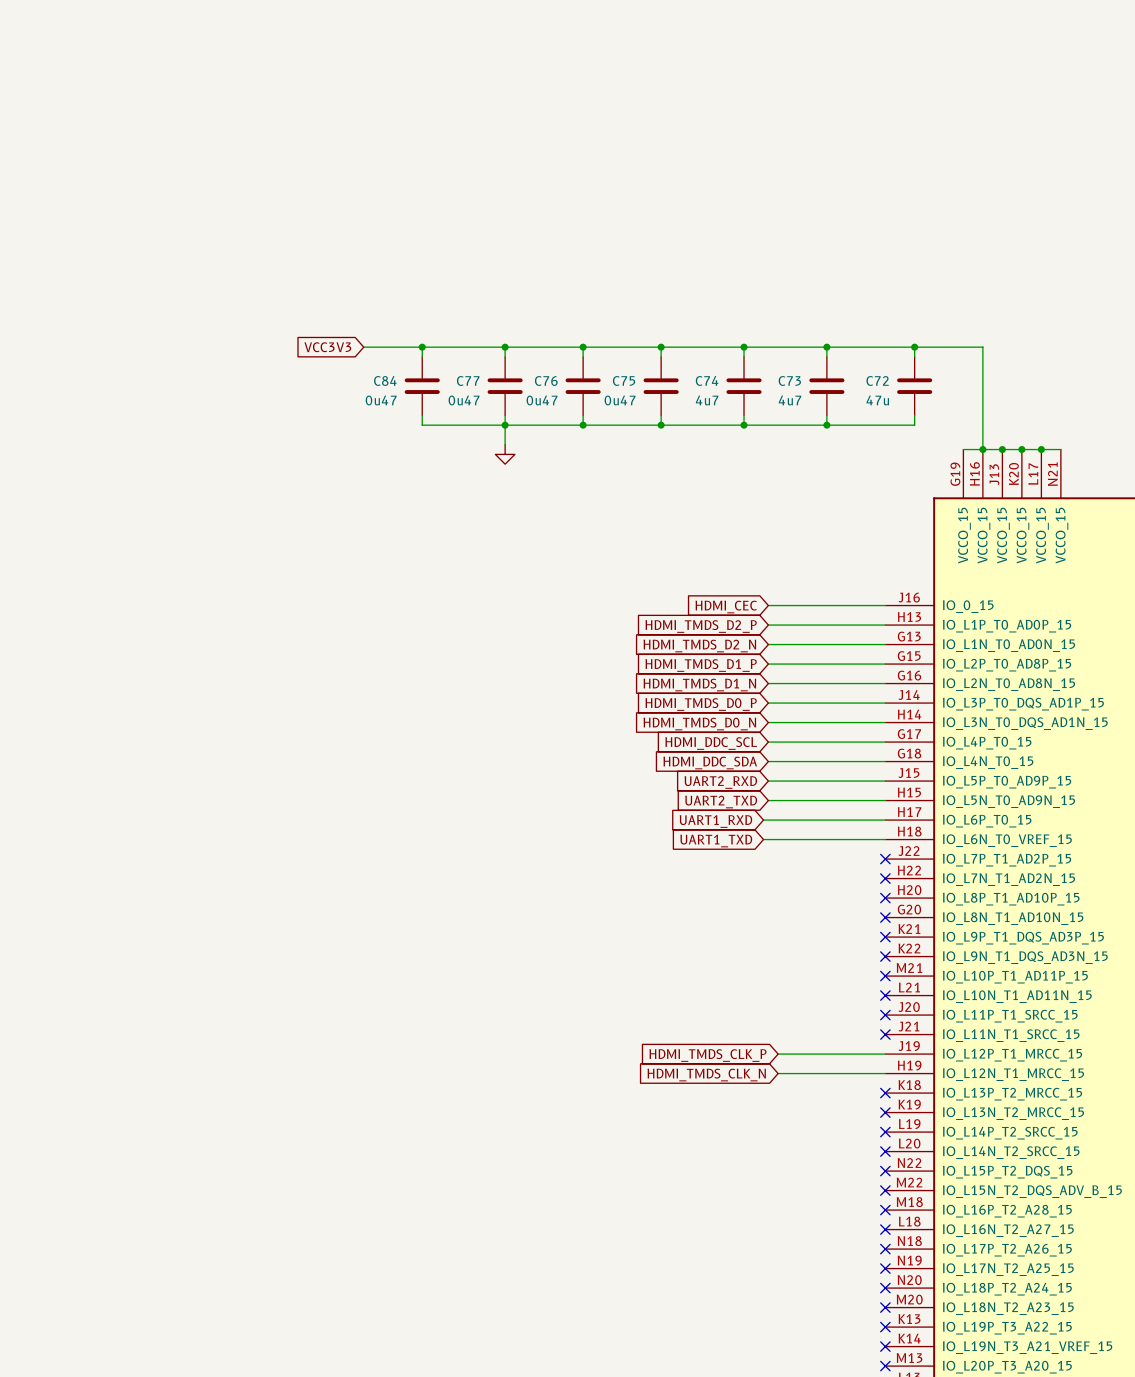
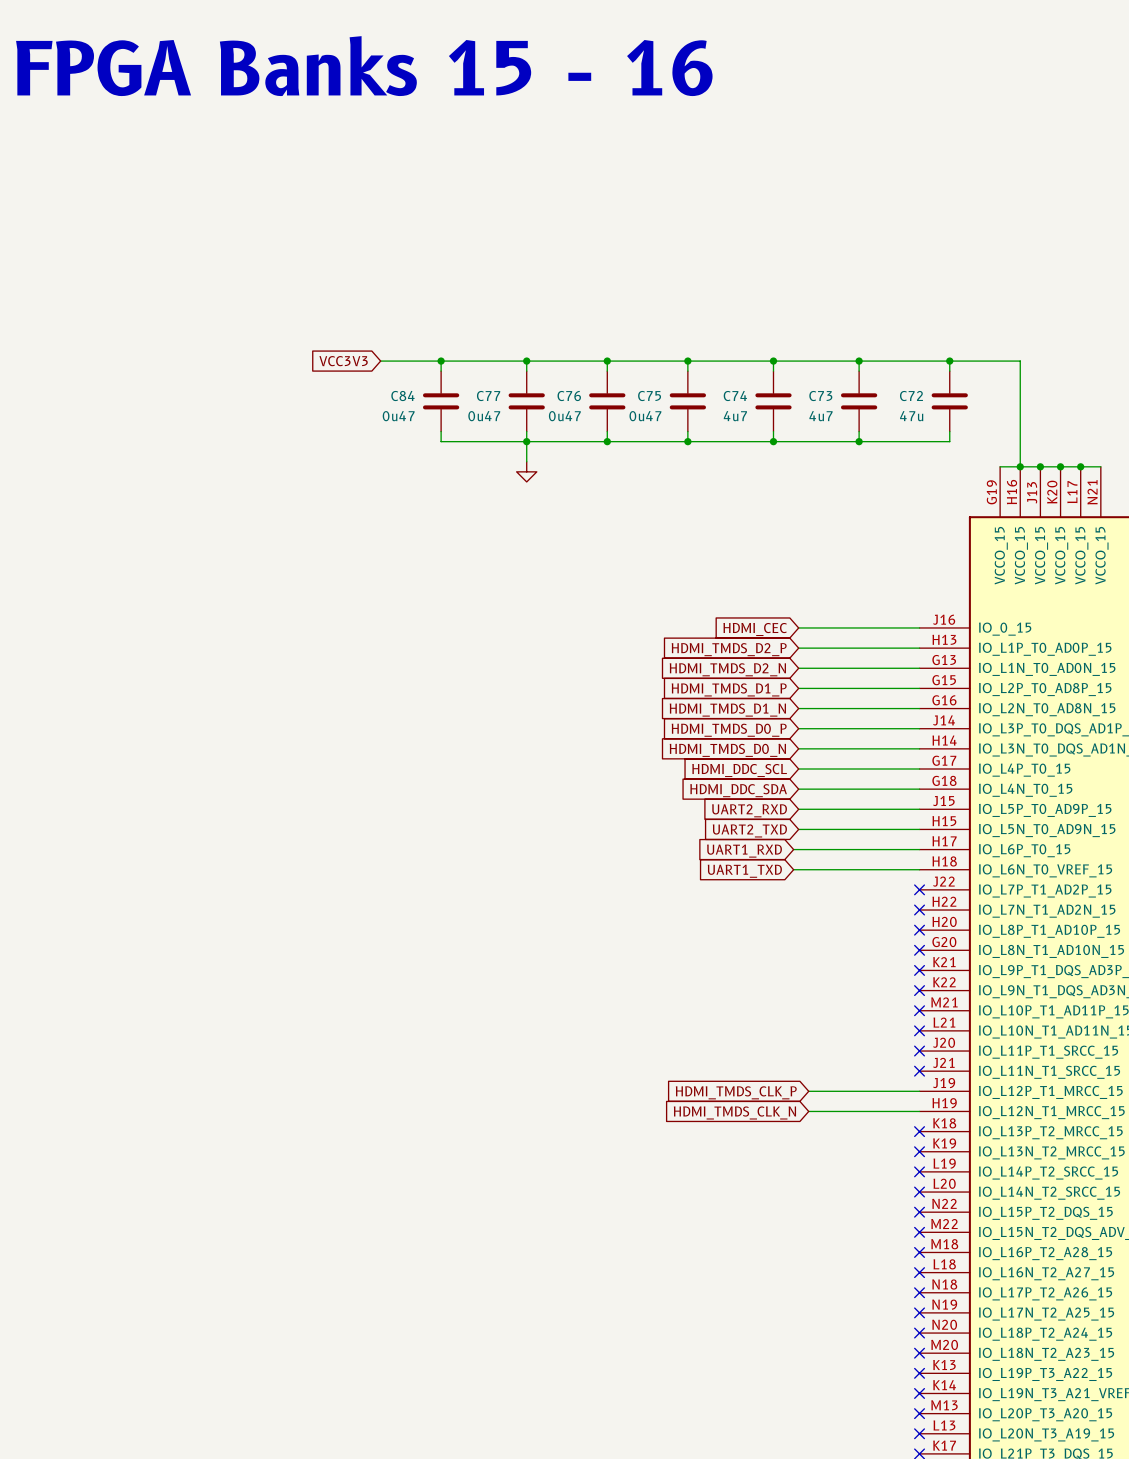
text: none -> FPGA Banks 15 - 16 (364, 66)

